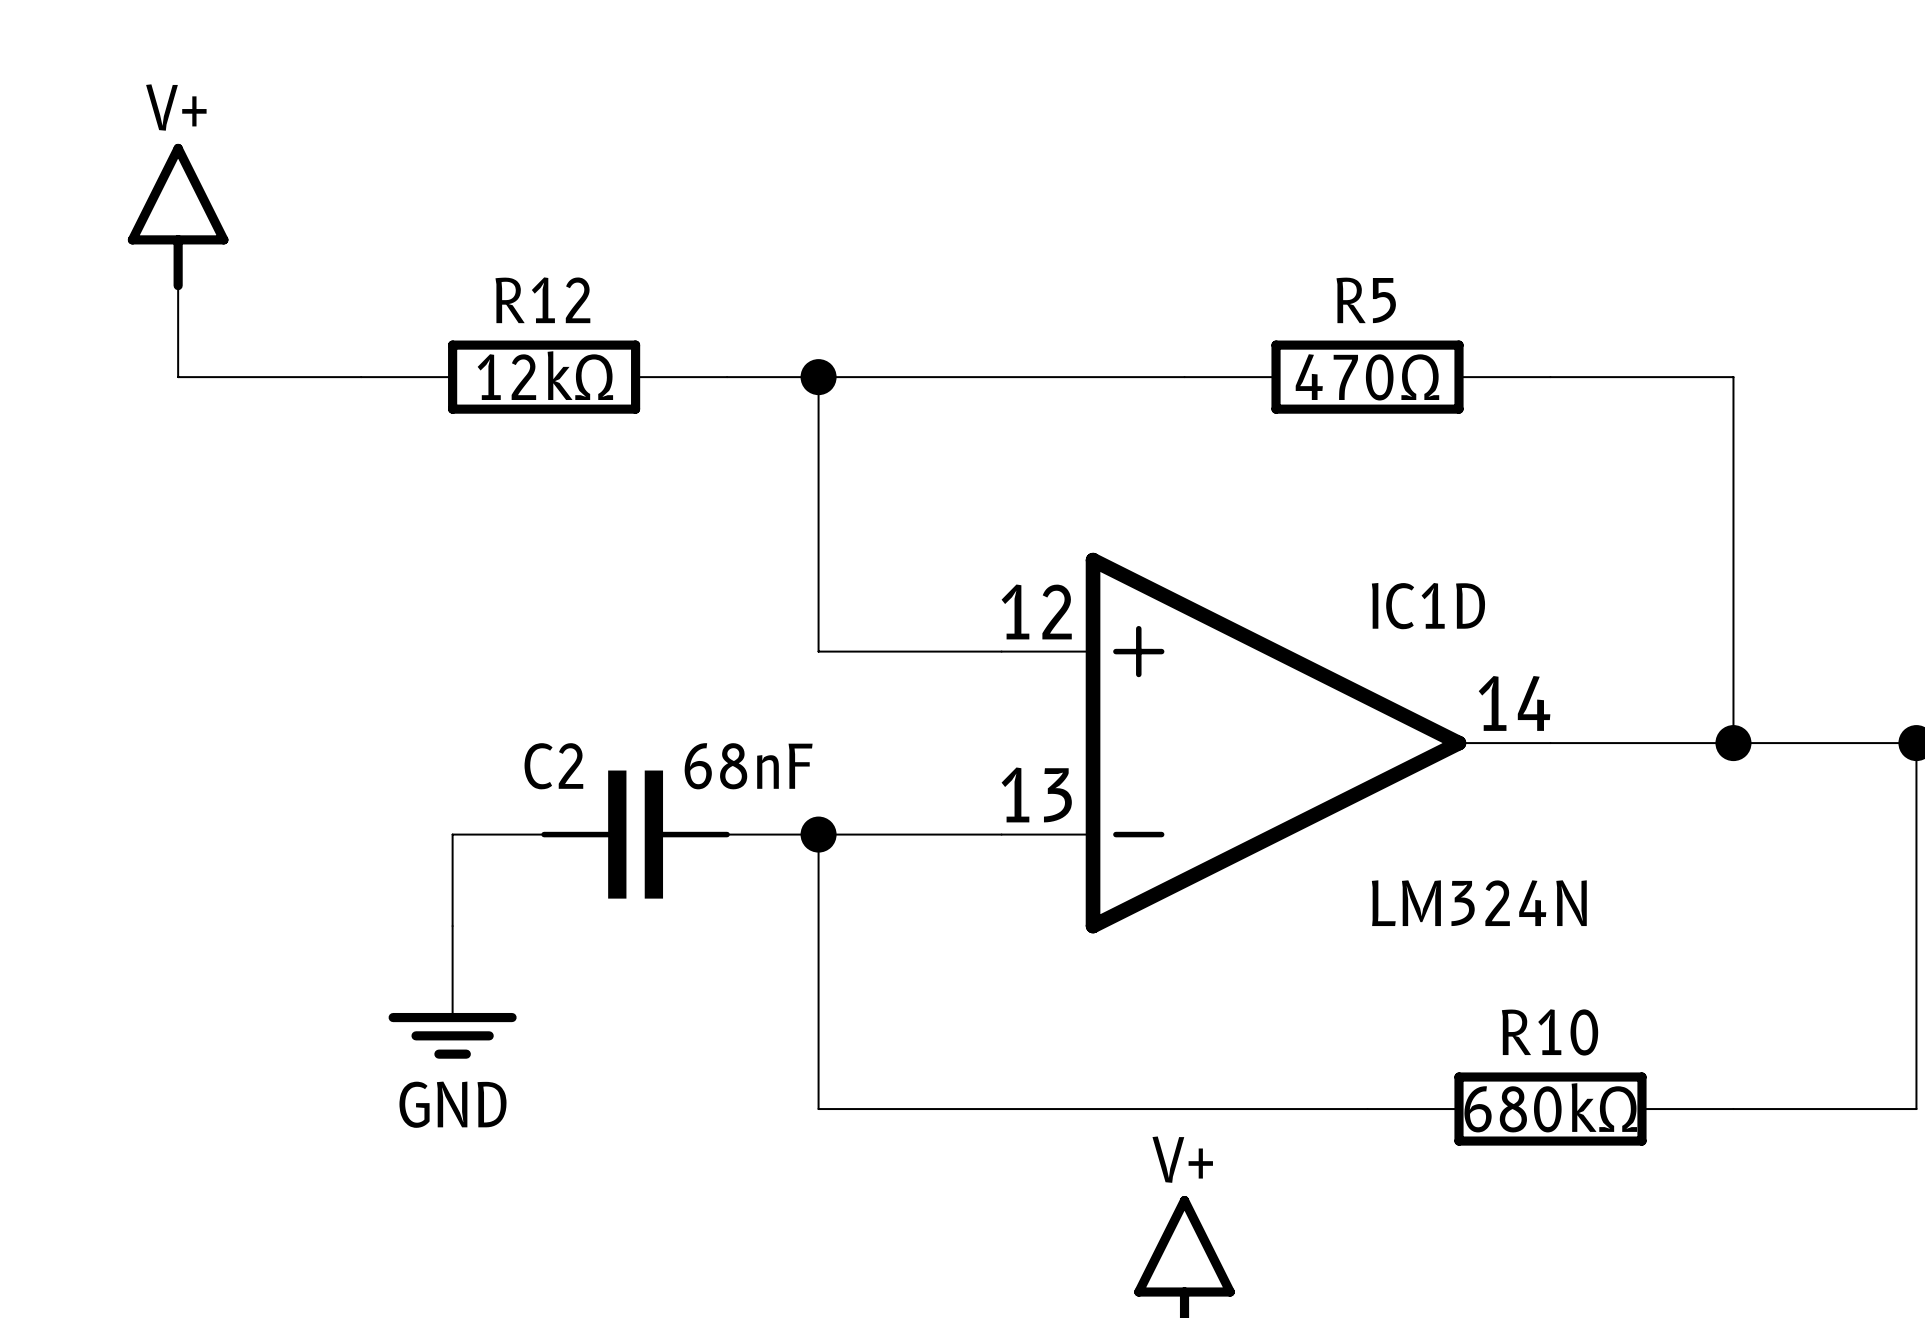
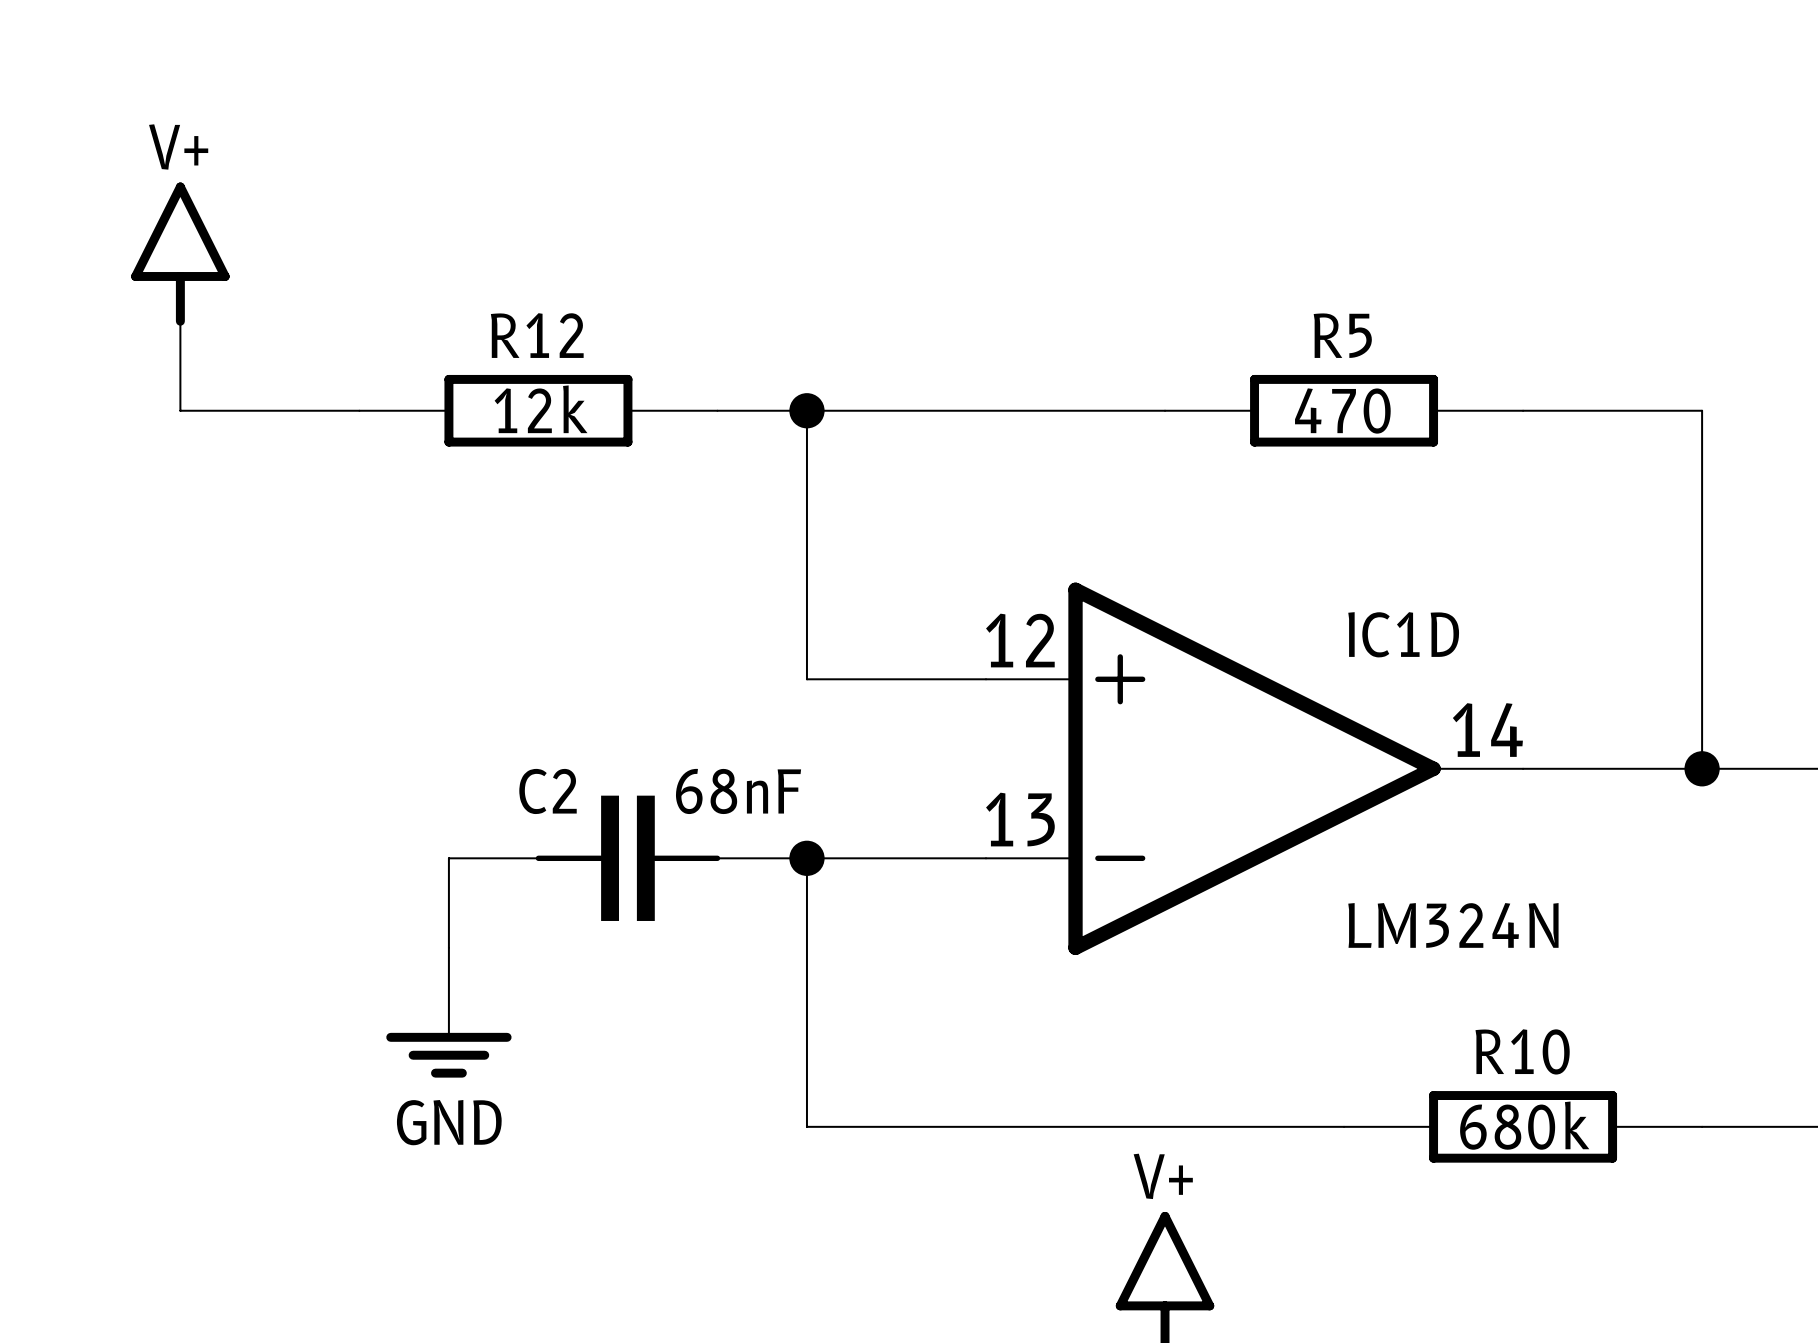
R12 value: 12kΩ (545, 375) -> 12k (541, 409)
R5 value: 470Ω (1367, 377) -> 470 (1342, 411)
R10 value: 680kΩ (1550, 1107) -> 680k (1524, 1125)

